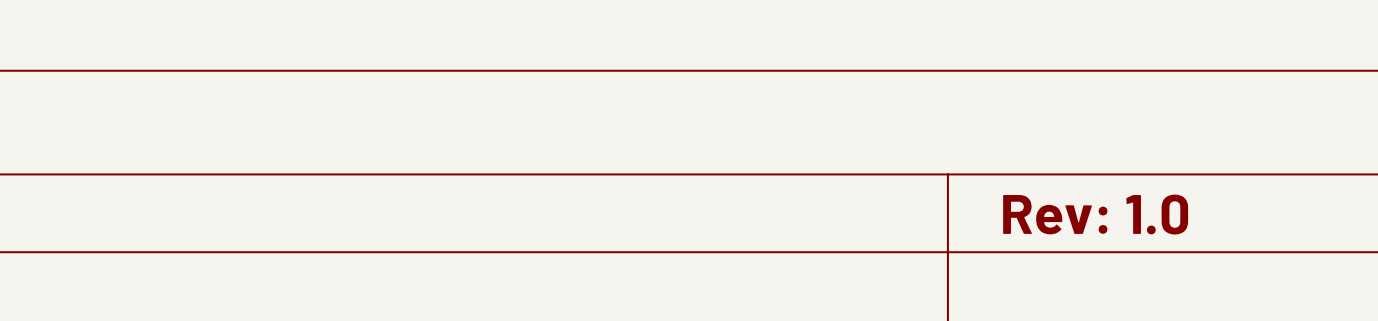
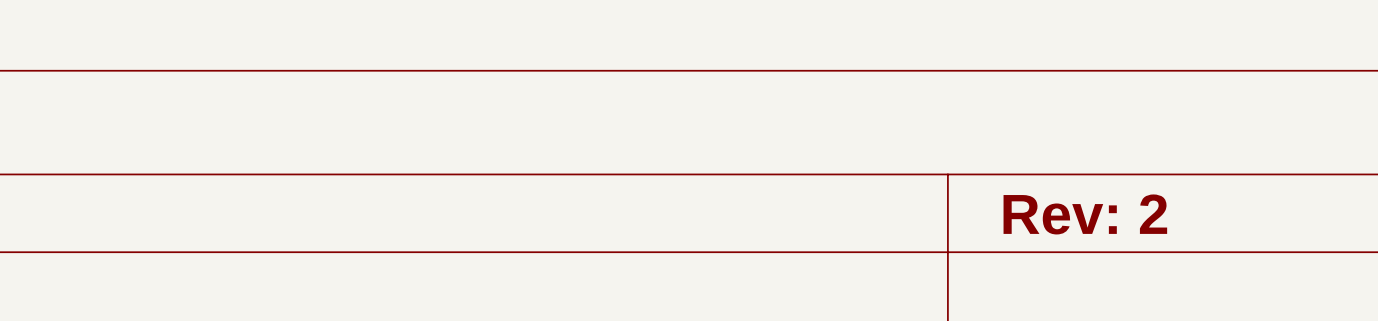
title block: Rev: 1.0 (1095, 214) -> Rev: 2 (1085, 214)

